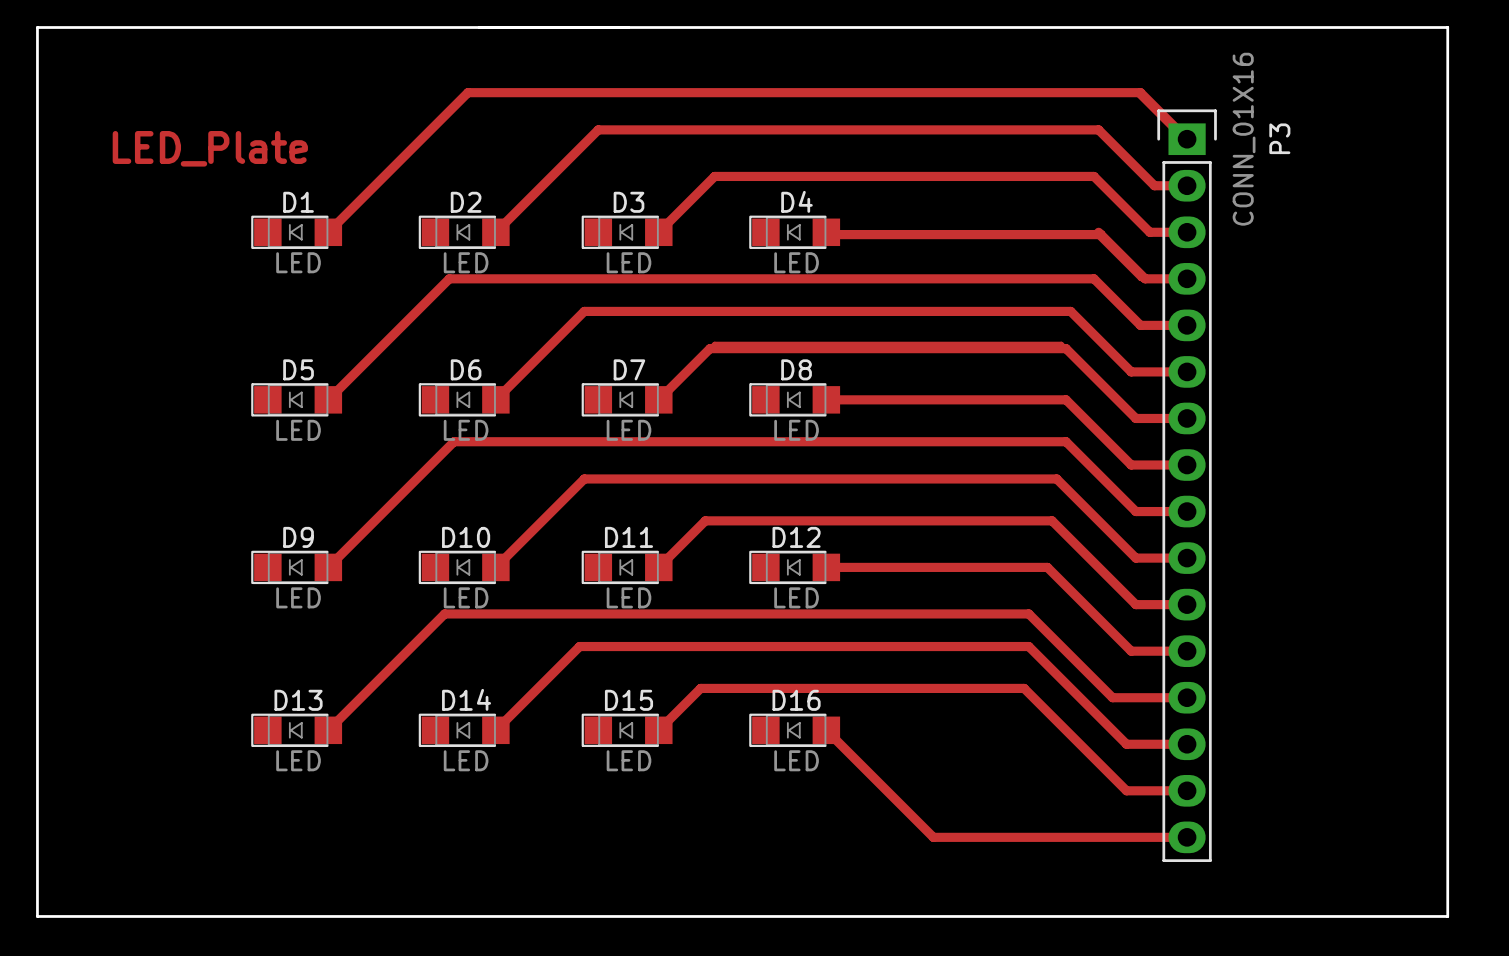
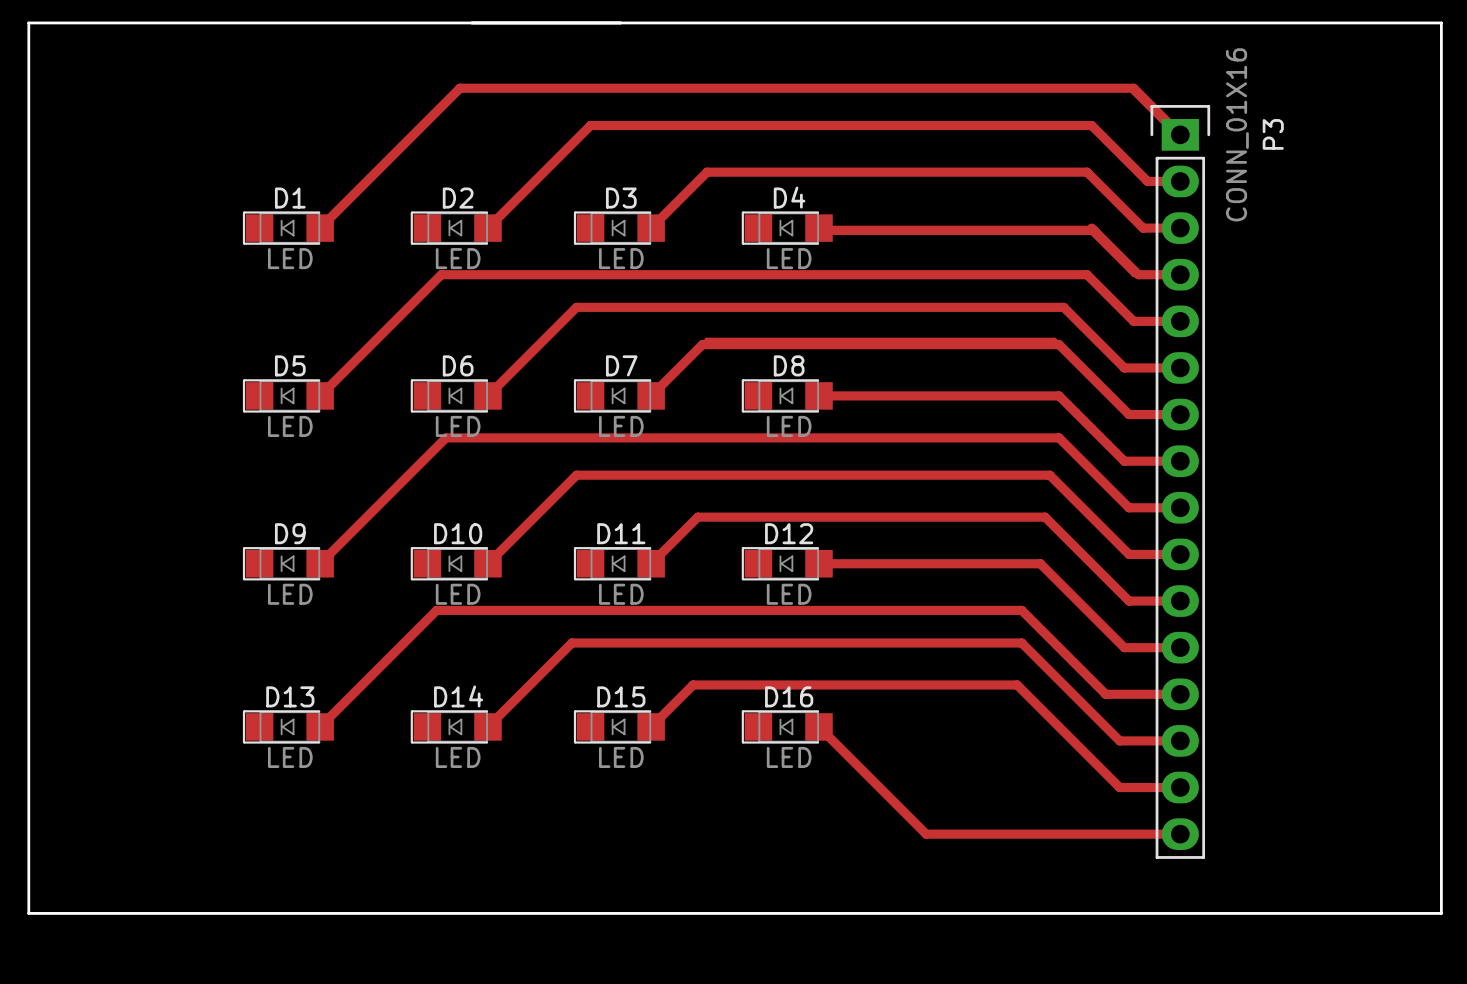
text: LED_Plate (210, 148) -> none

